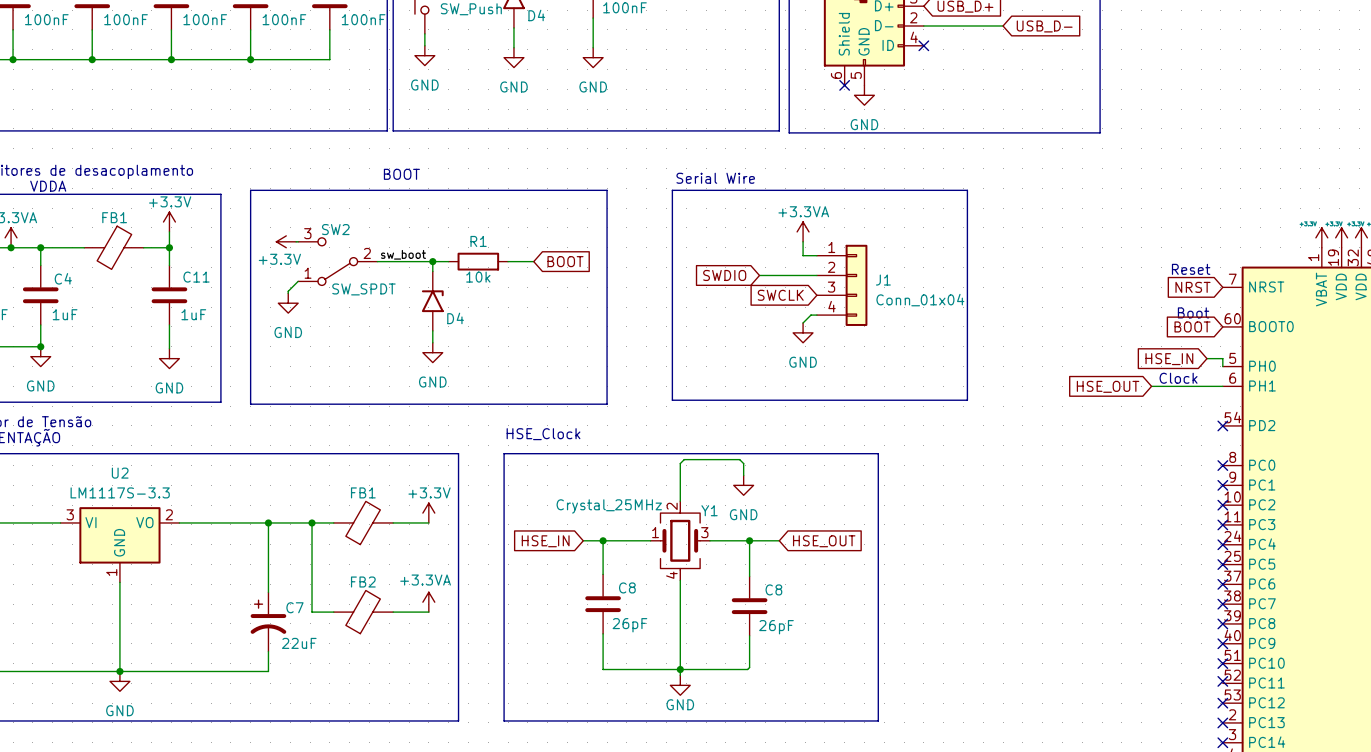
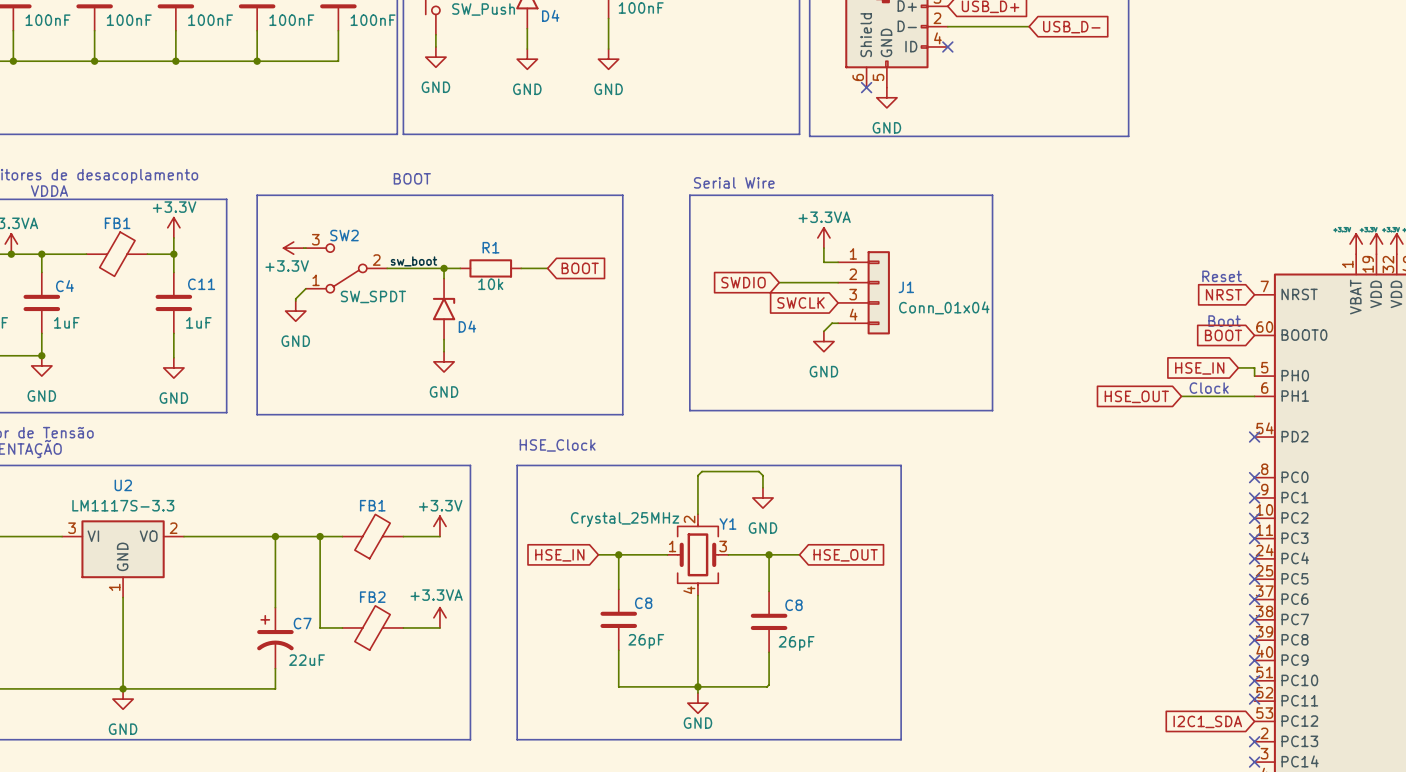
global label: none -> I2C1_SDA (1207, 721)
no-connect mark: (1222, 703) -> none

